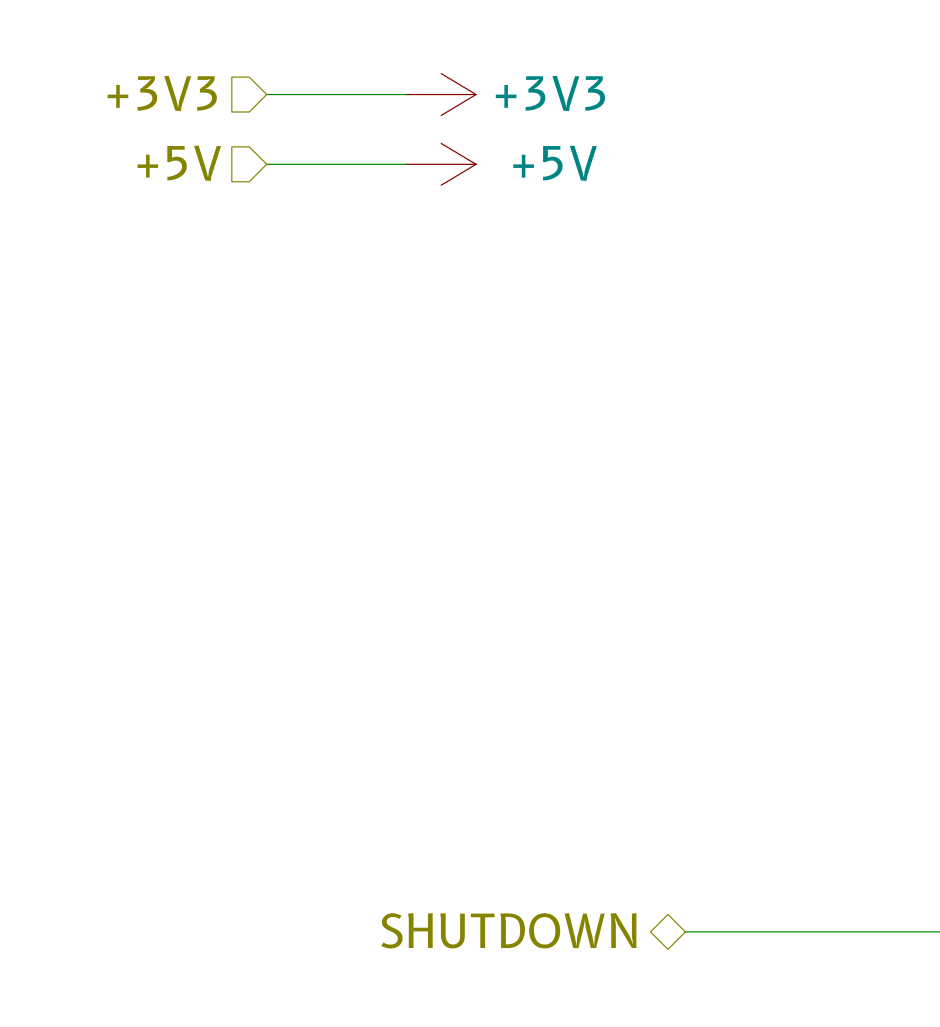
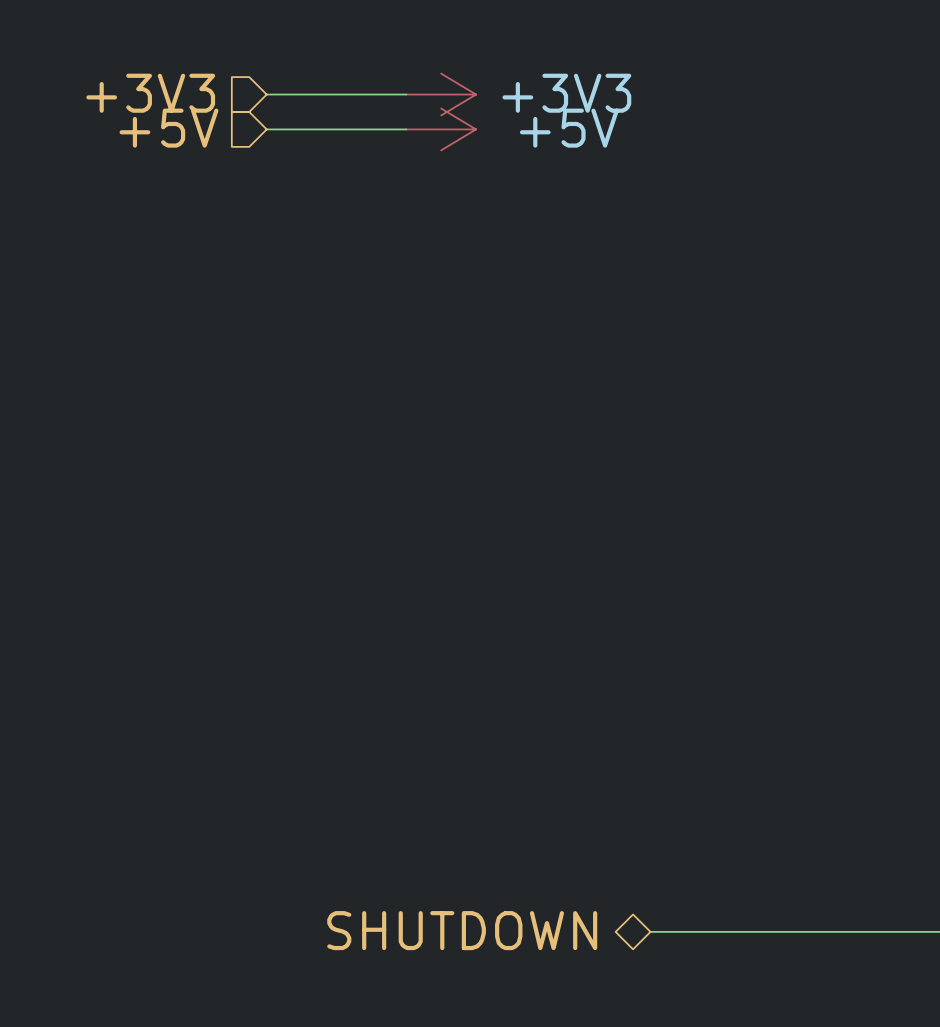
hierarchical label position: +5V (179, 163) -> +5V (168, 128)
wire: (266, 164) (406, 164) -> (266, 129) (406, 129)
power symbol position: +5V (441, 164) -> +5V (441, 129)
hierarchical label position: SHUTDOWN (508, 930) -> SHUTDOWN (462, 930)
wire: none -> (650, 931) (685, 931)

